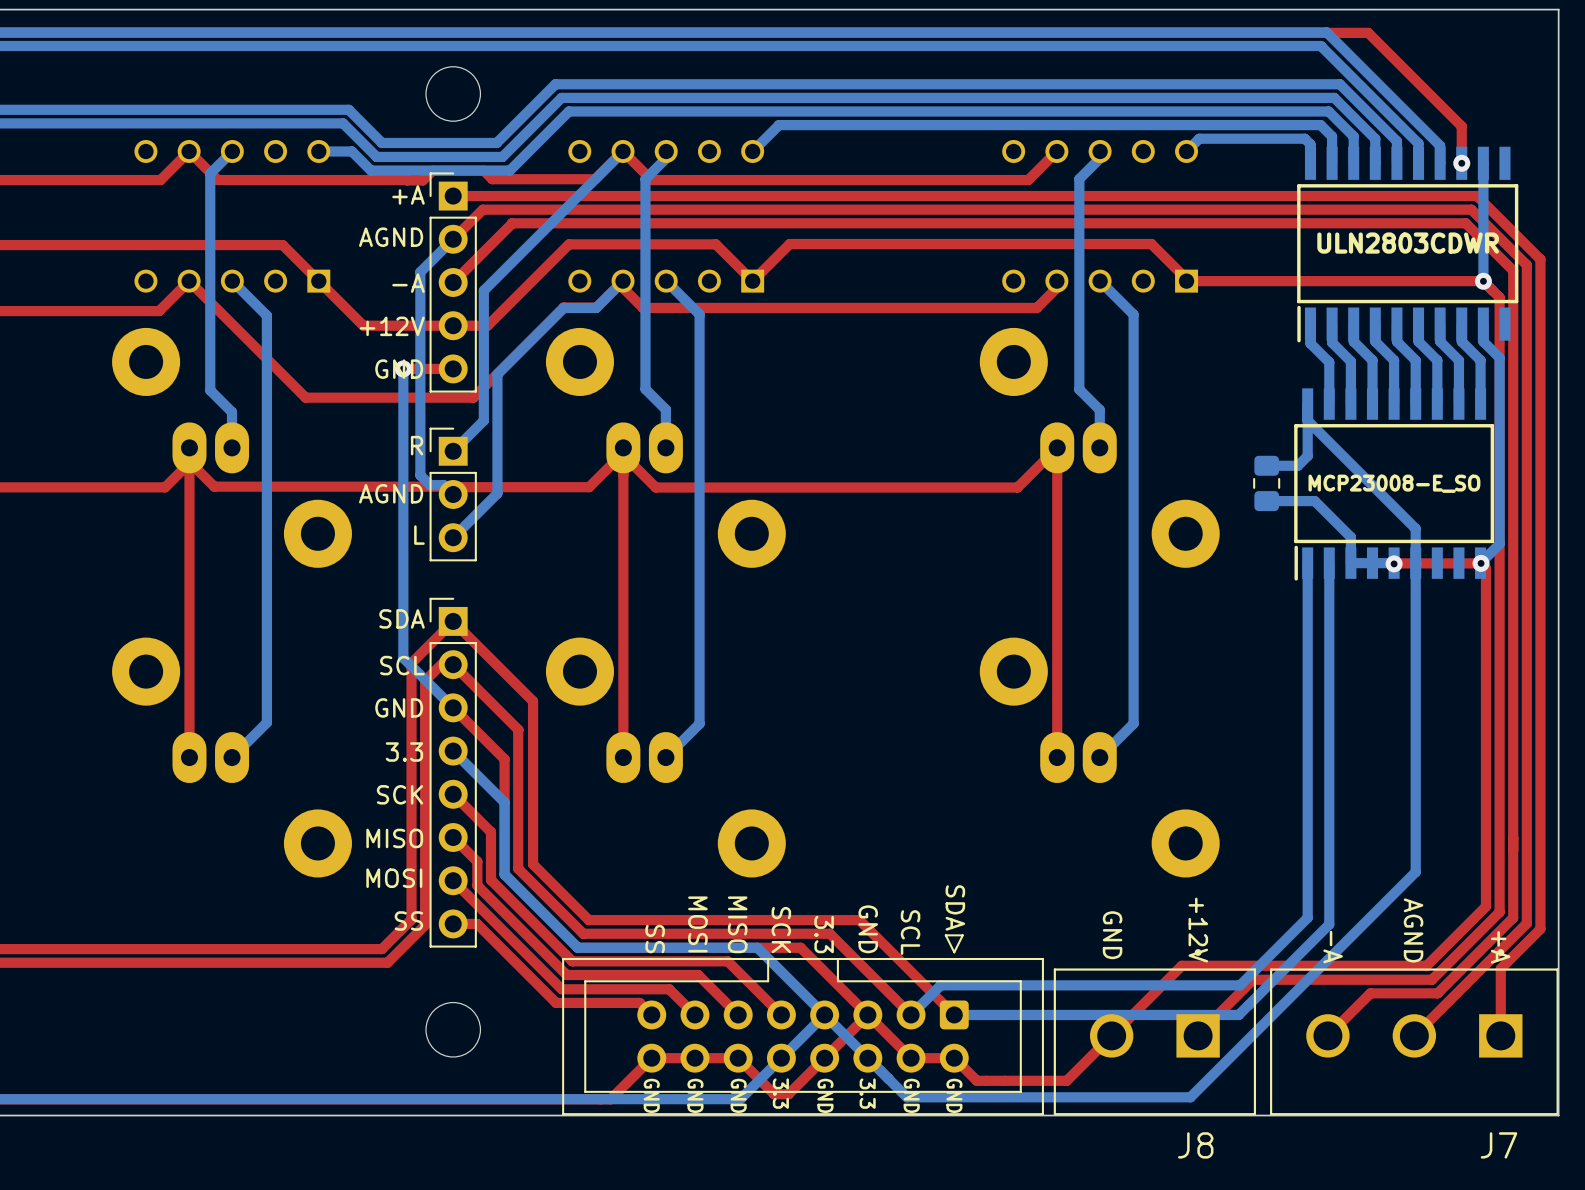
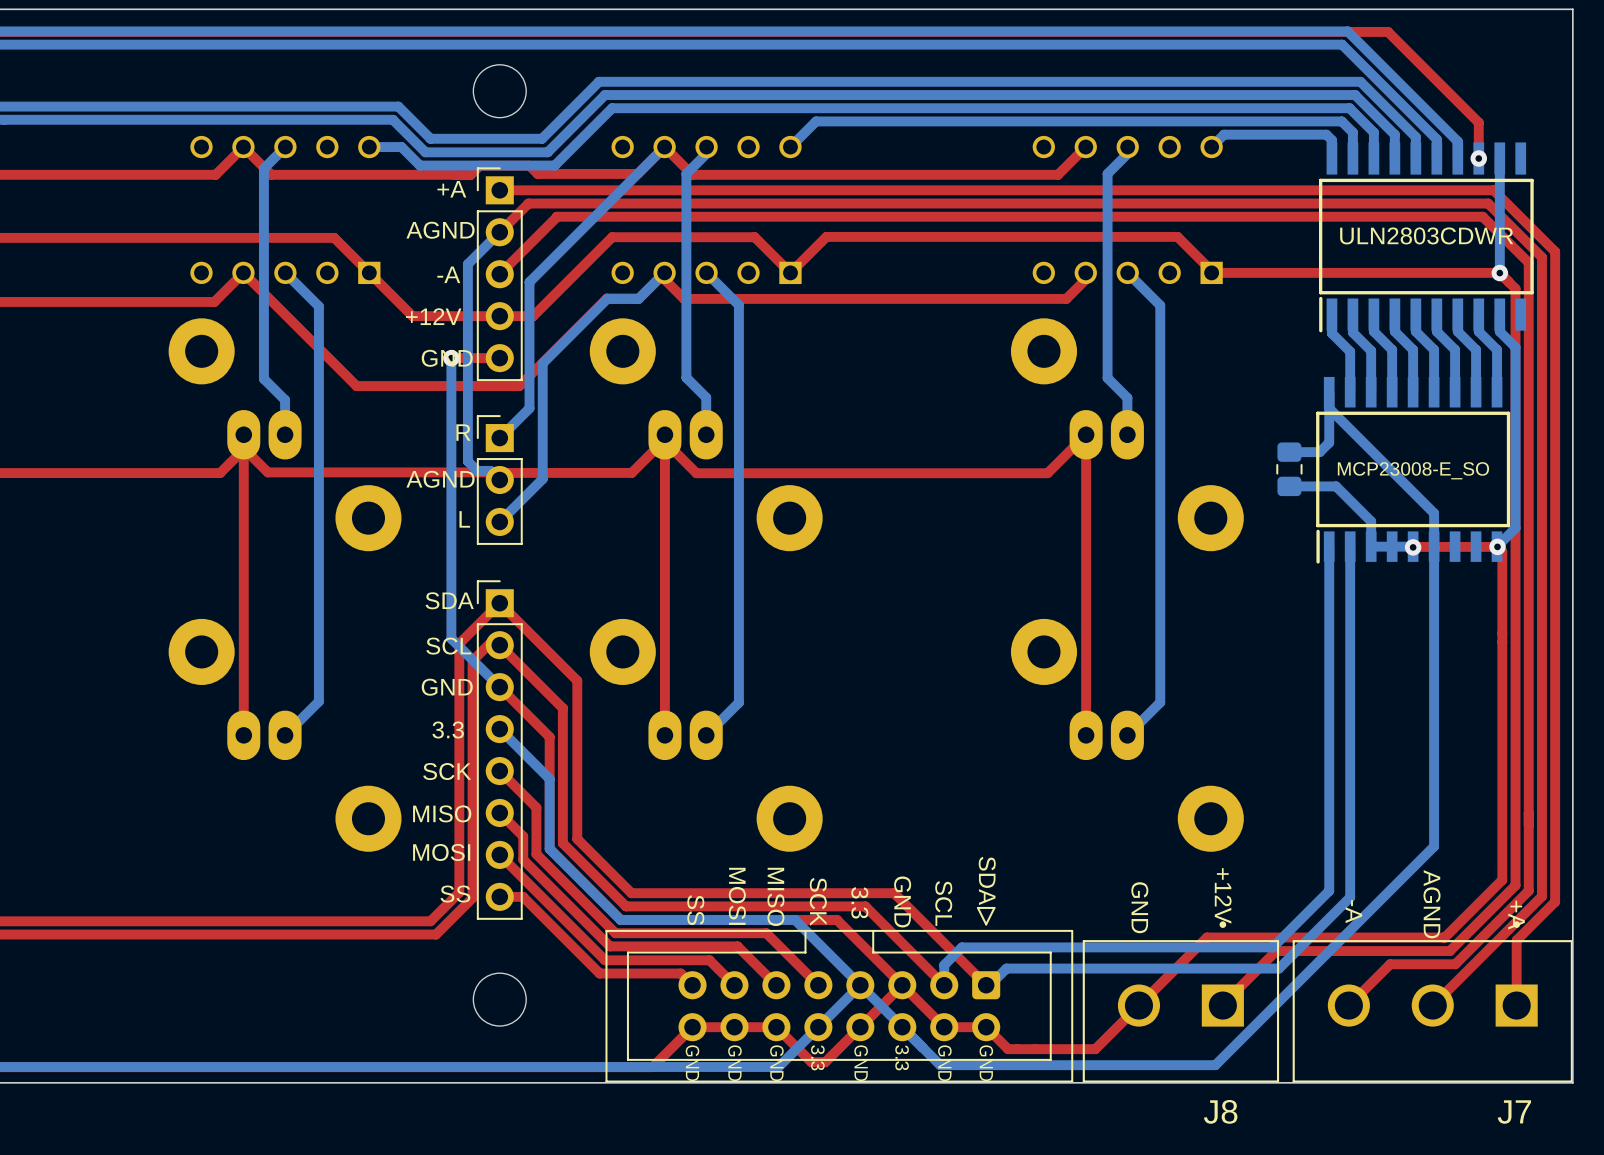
bottom track: (1249, 976) (1240, 985) (940, 985) (911, 1014) -> (1272, 947) (961, 947) (944, 965) (944, 985)
bottom track: (1255, 997) (1238, 1014) (954, 1014) -> (1279, 968) (1006, 968) (994, 982) (986, 982) (986, 985)

